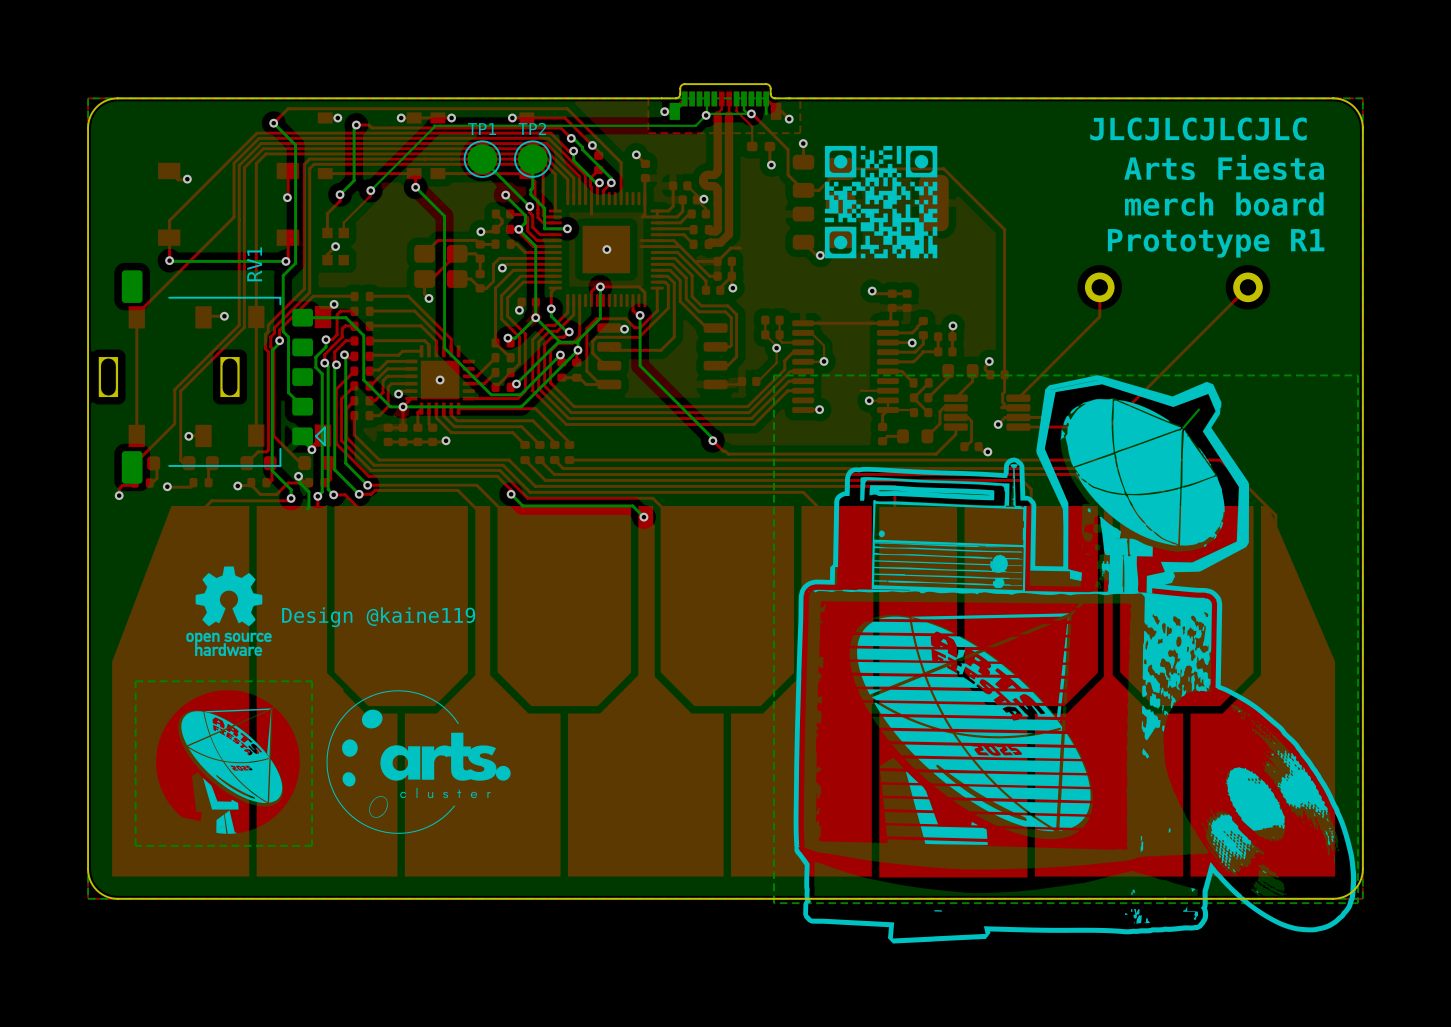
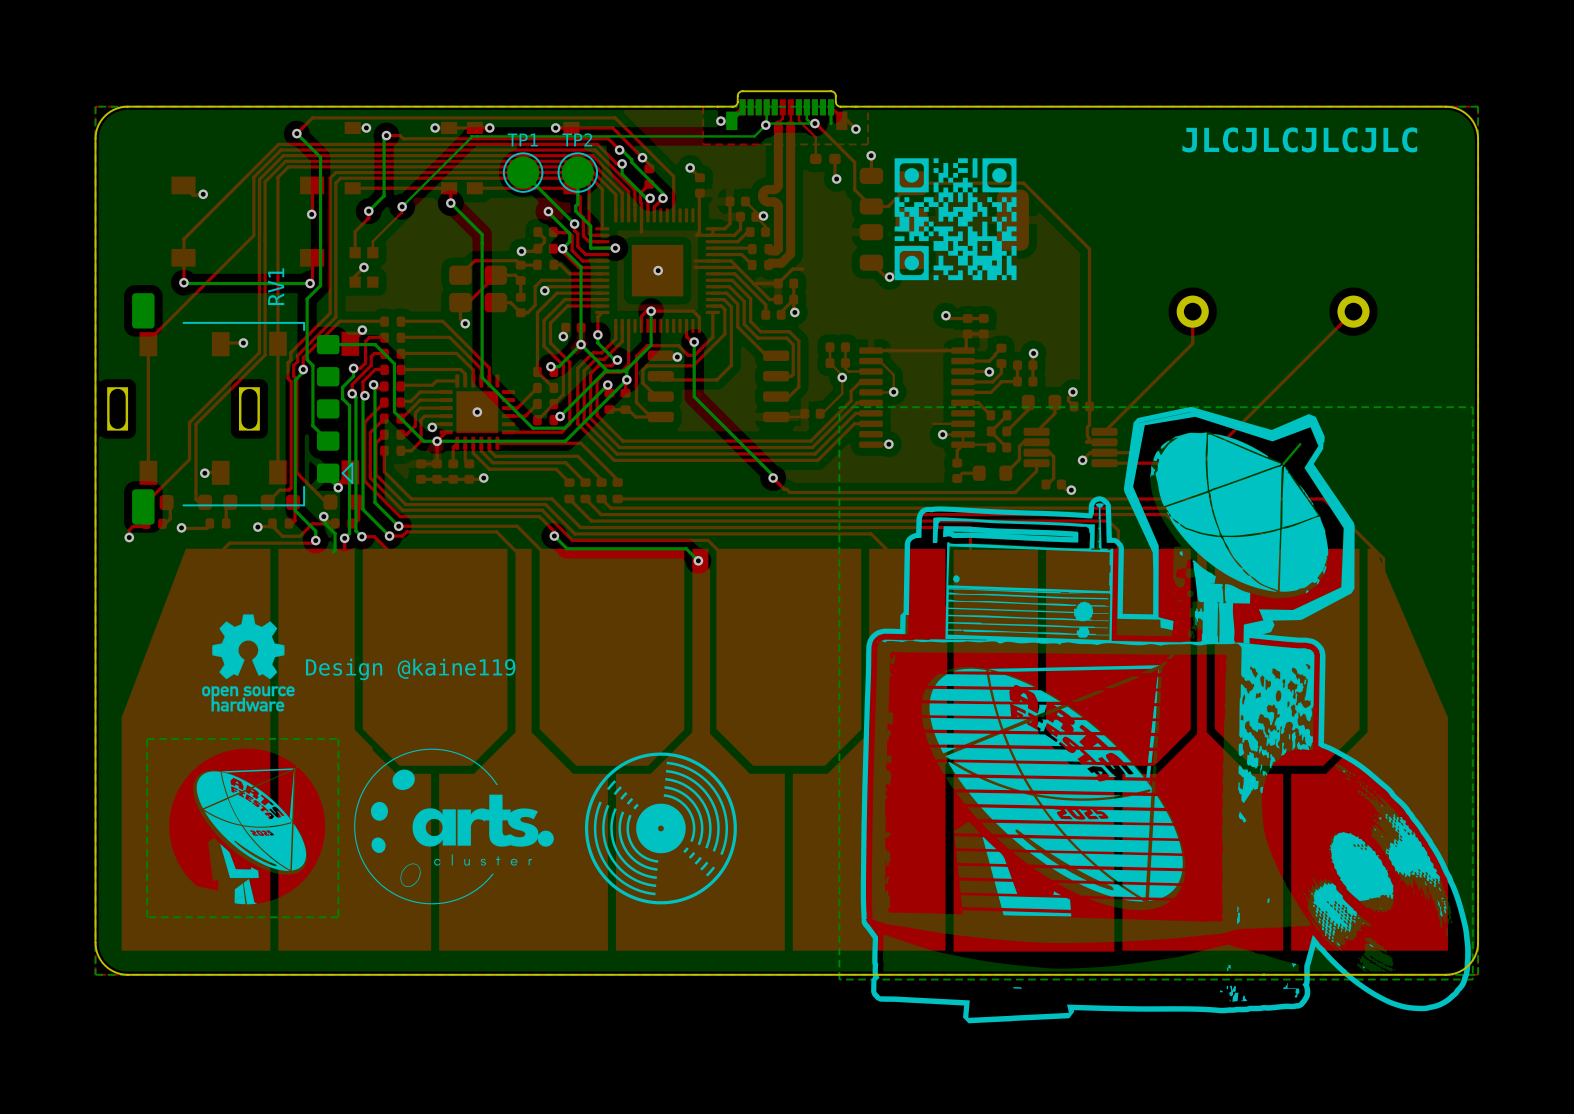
text: Arts Fiesta (1224, 167) -> none
text: merch board (1224, 204) -> none
text: Prototype R1 (1216, 243) -> none
drawing: none -> [584, 752, 737, 905]

